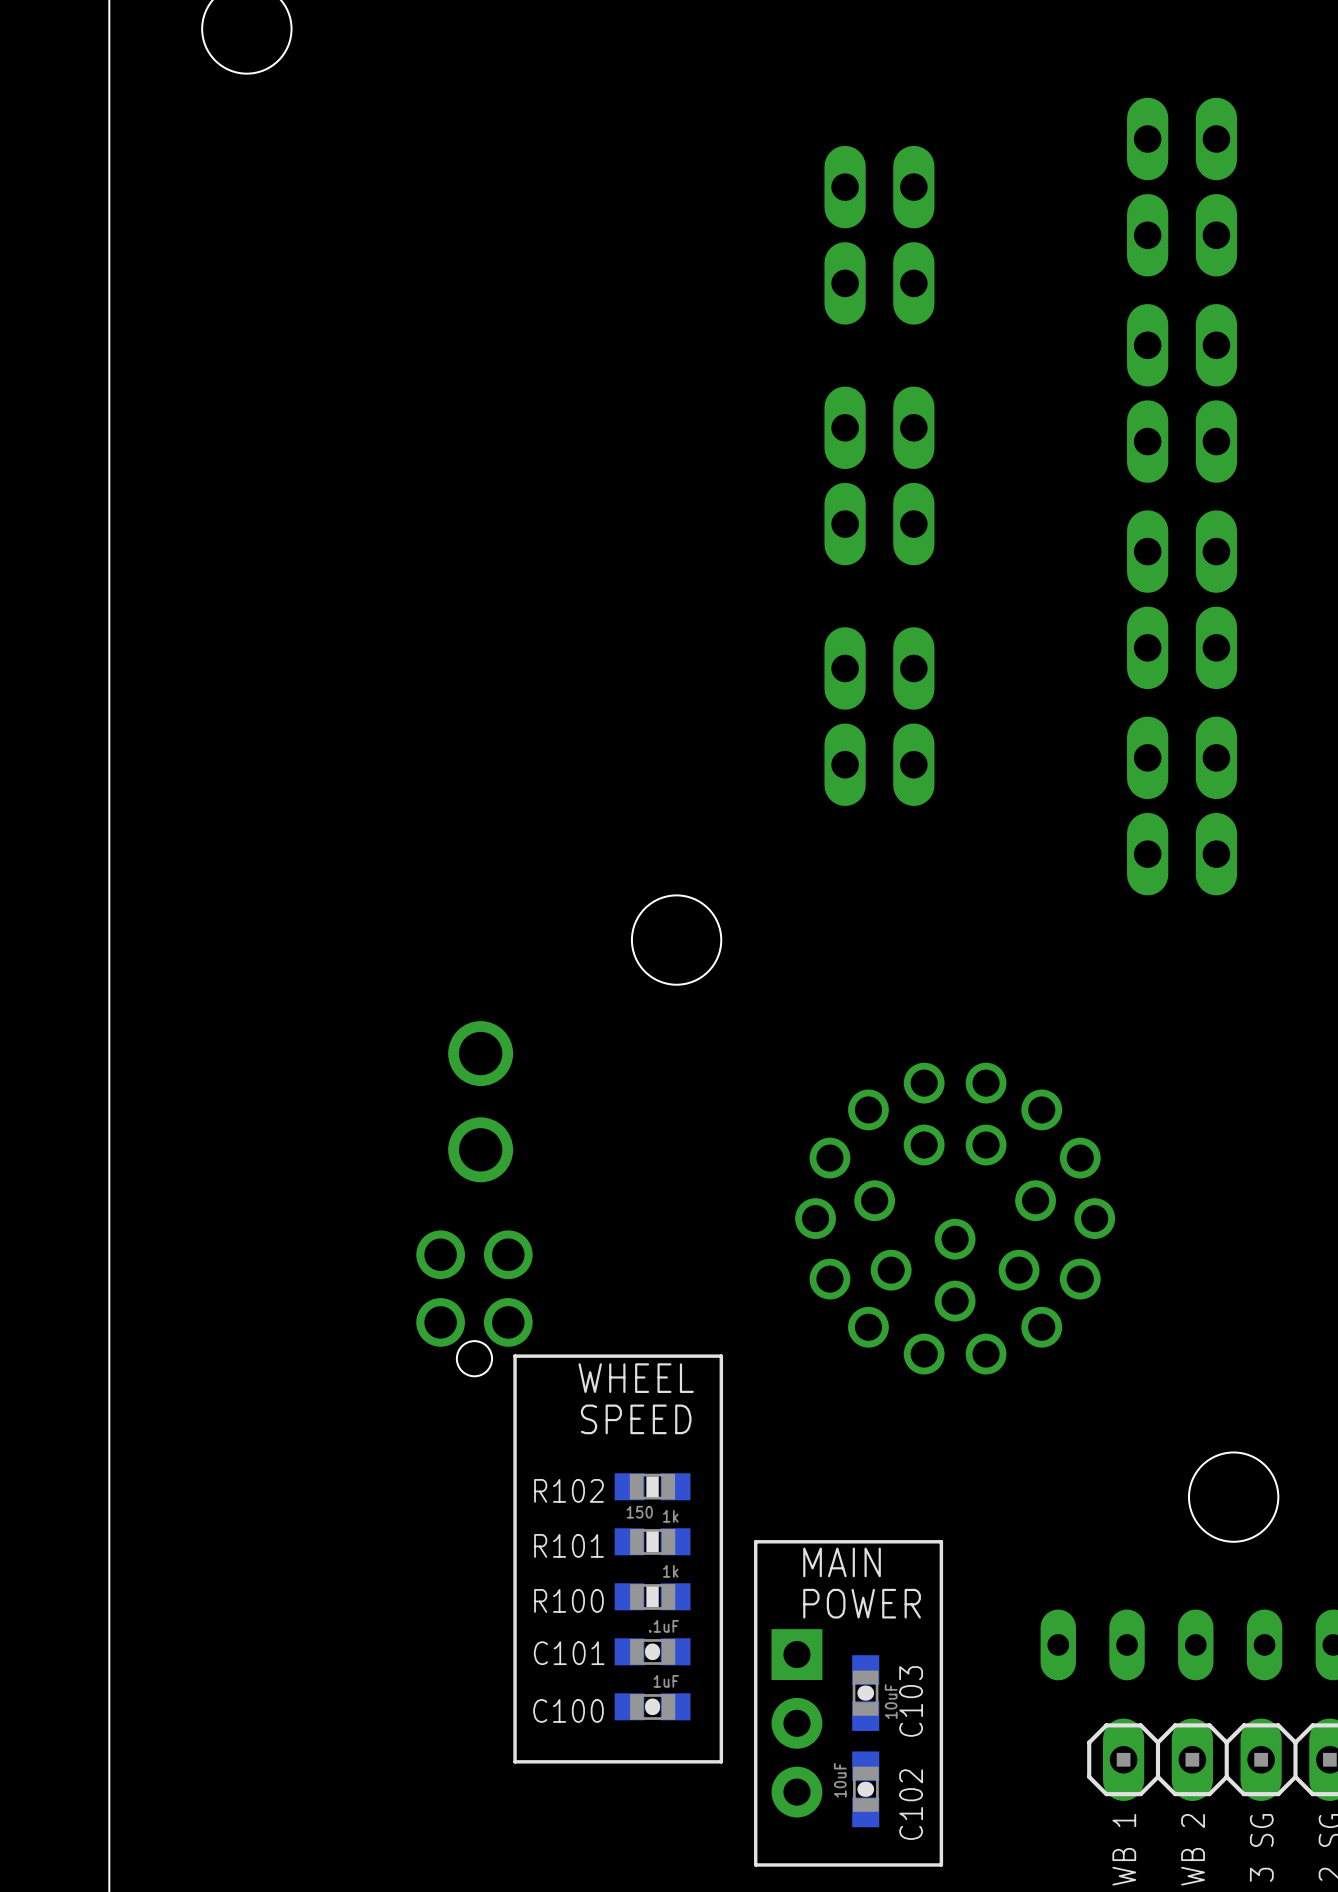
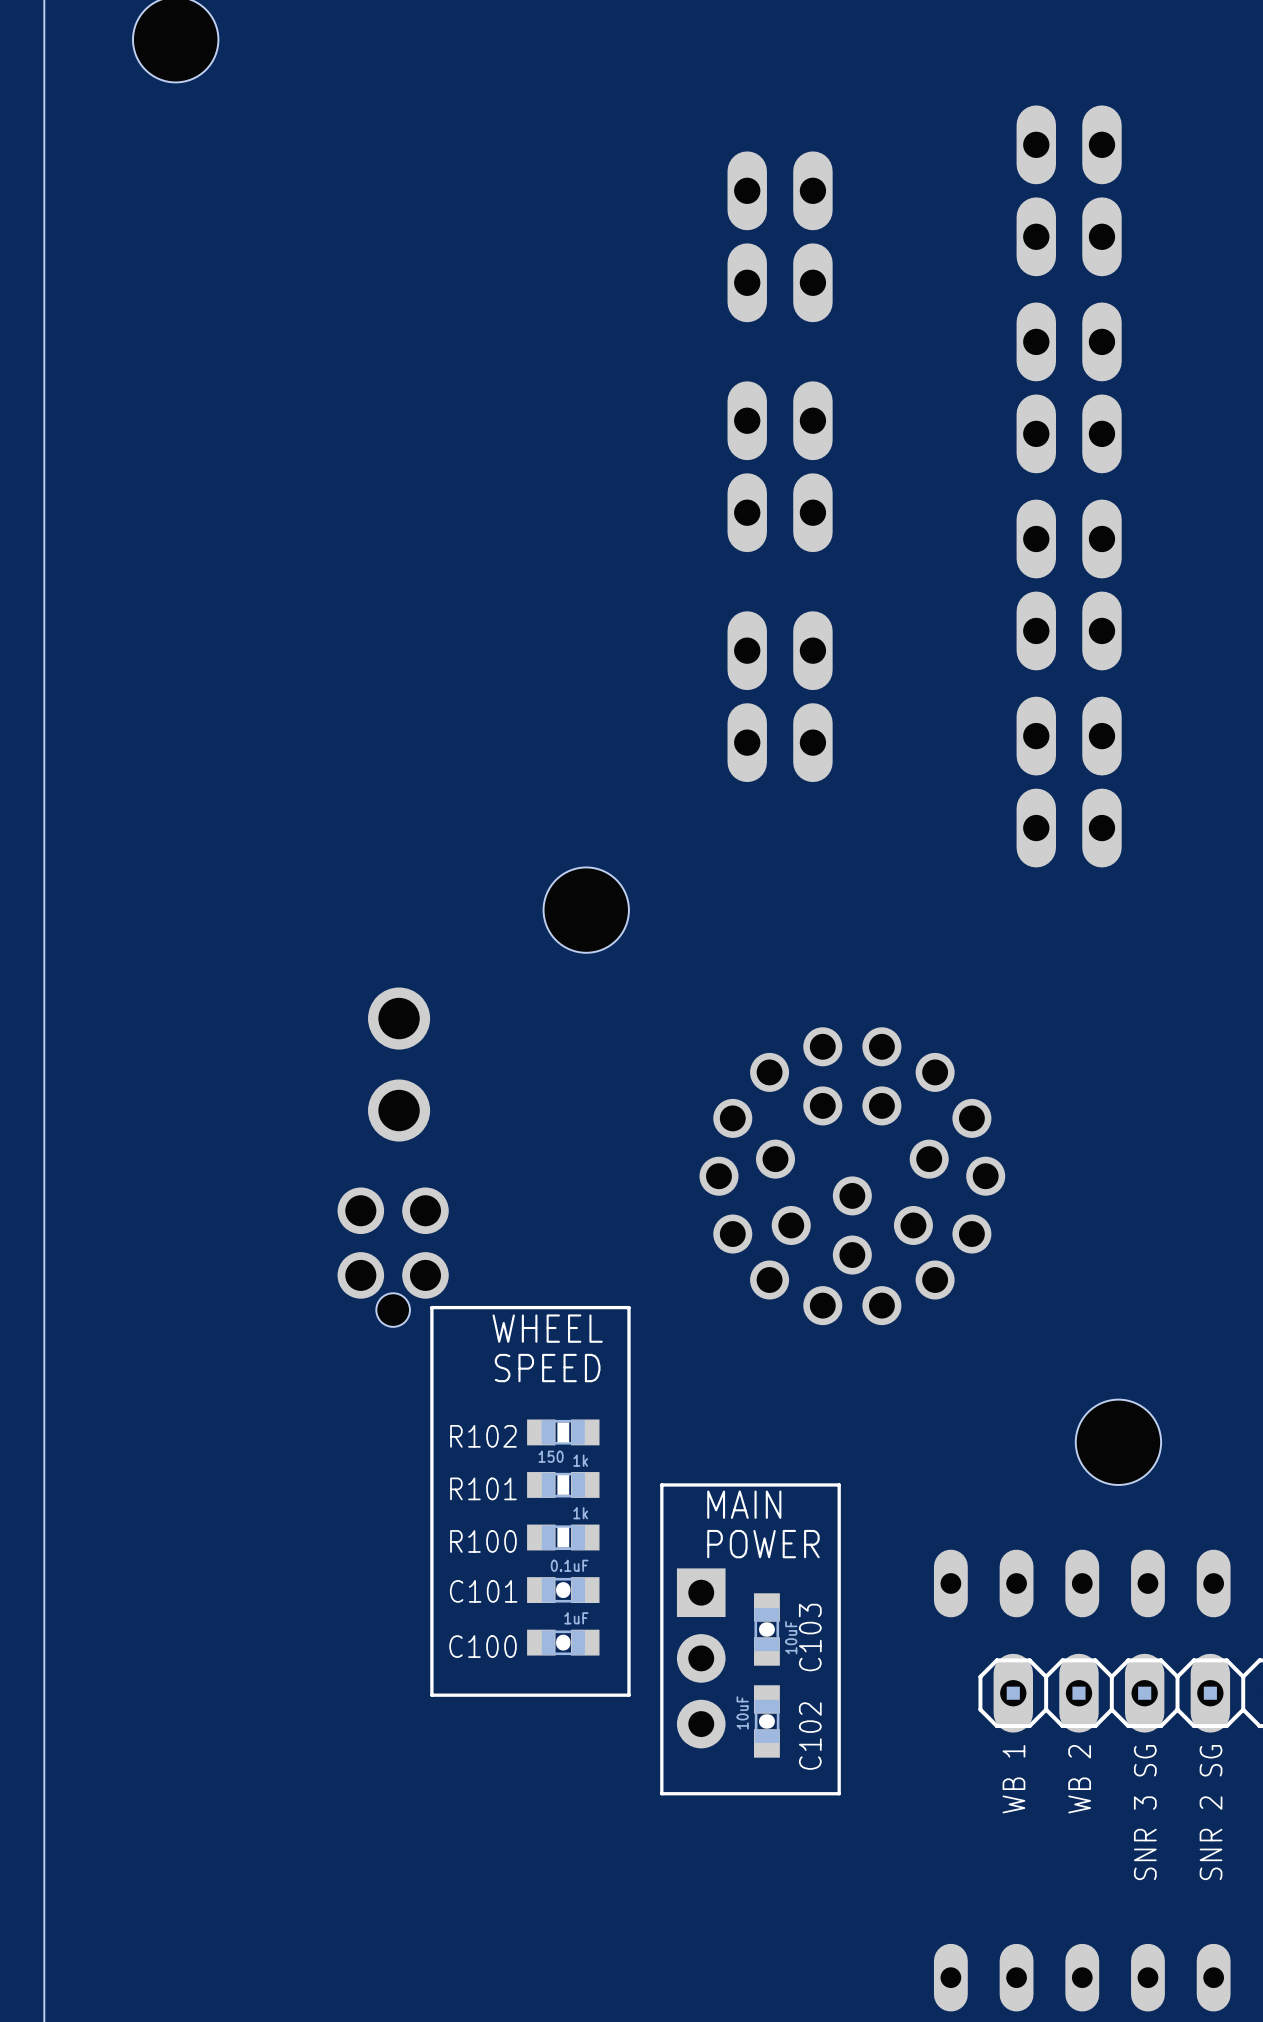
C101 value: .1uF (663, 1626) -> 0.1uF (569, 1565)

